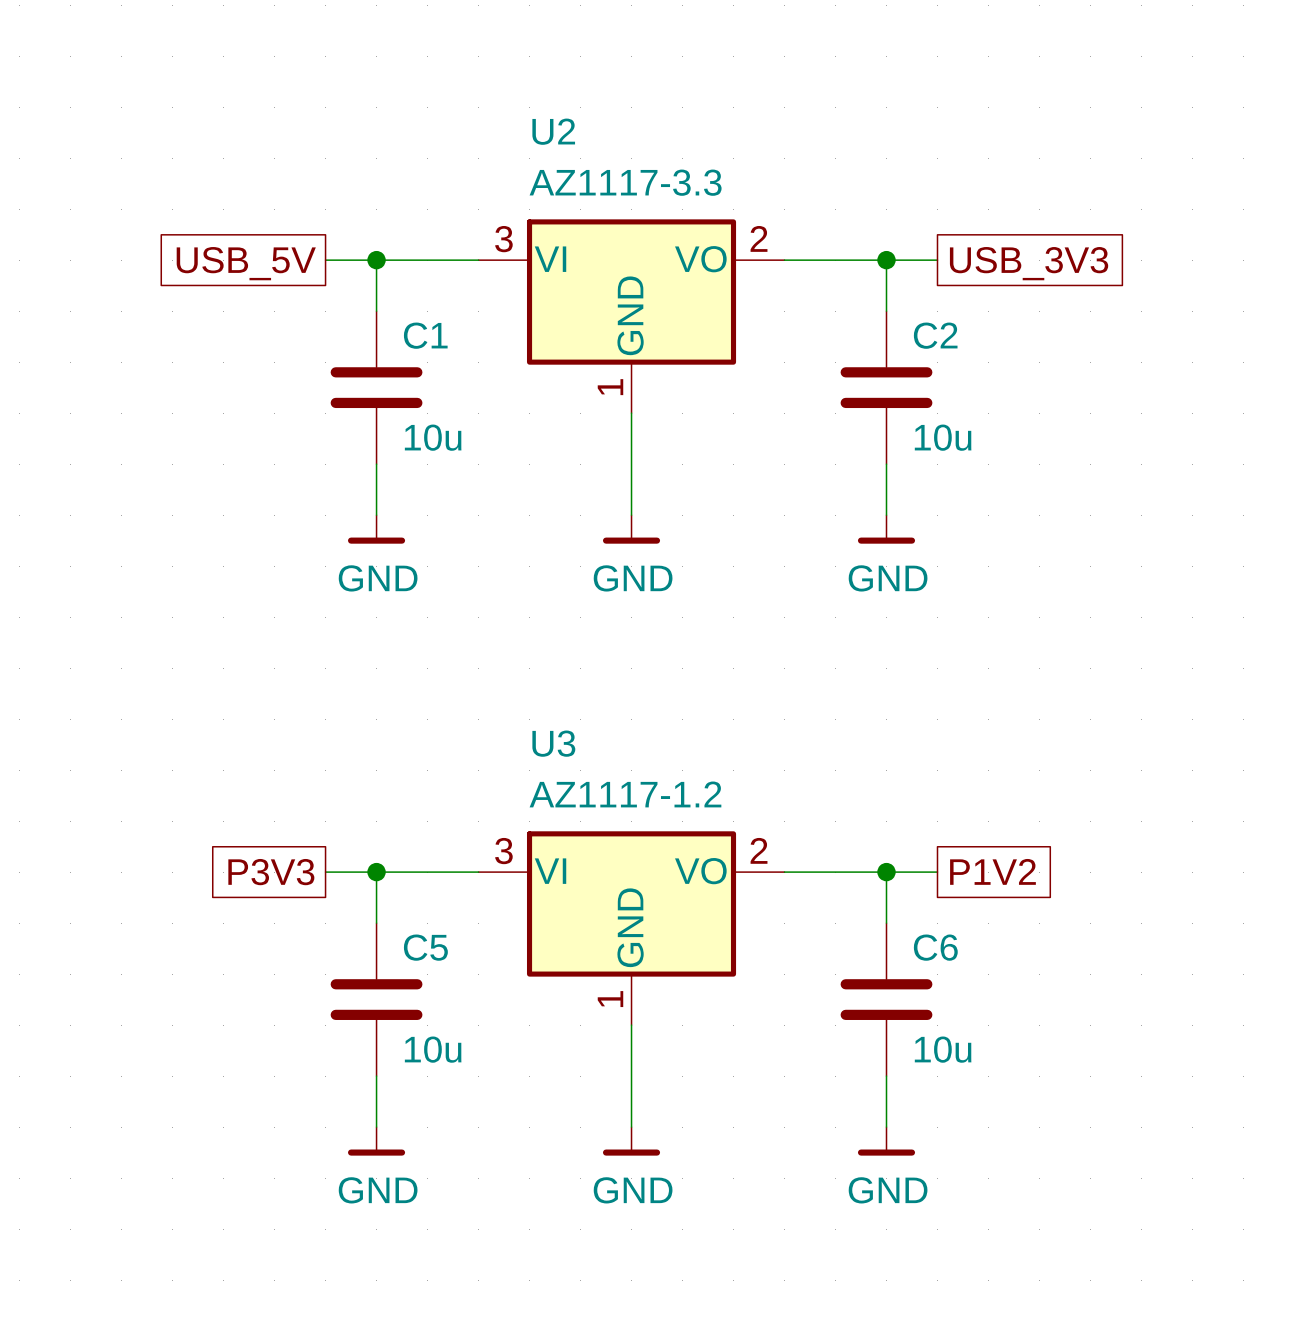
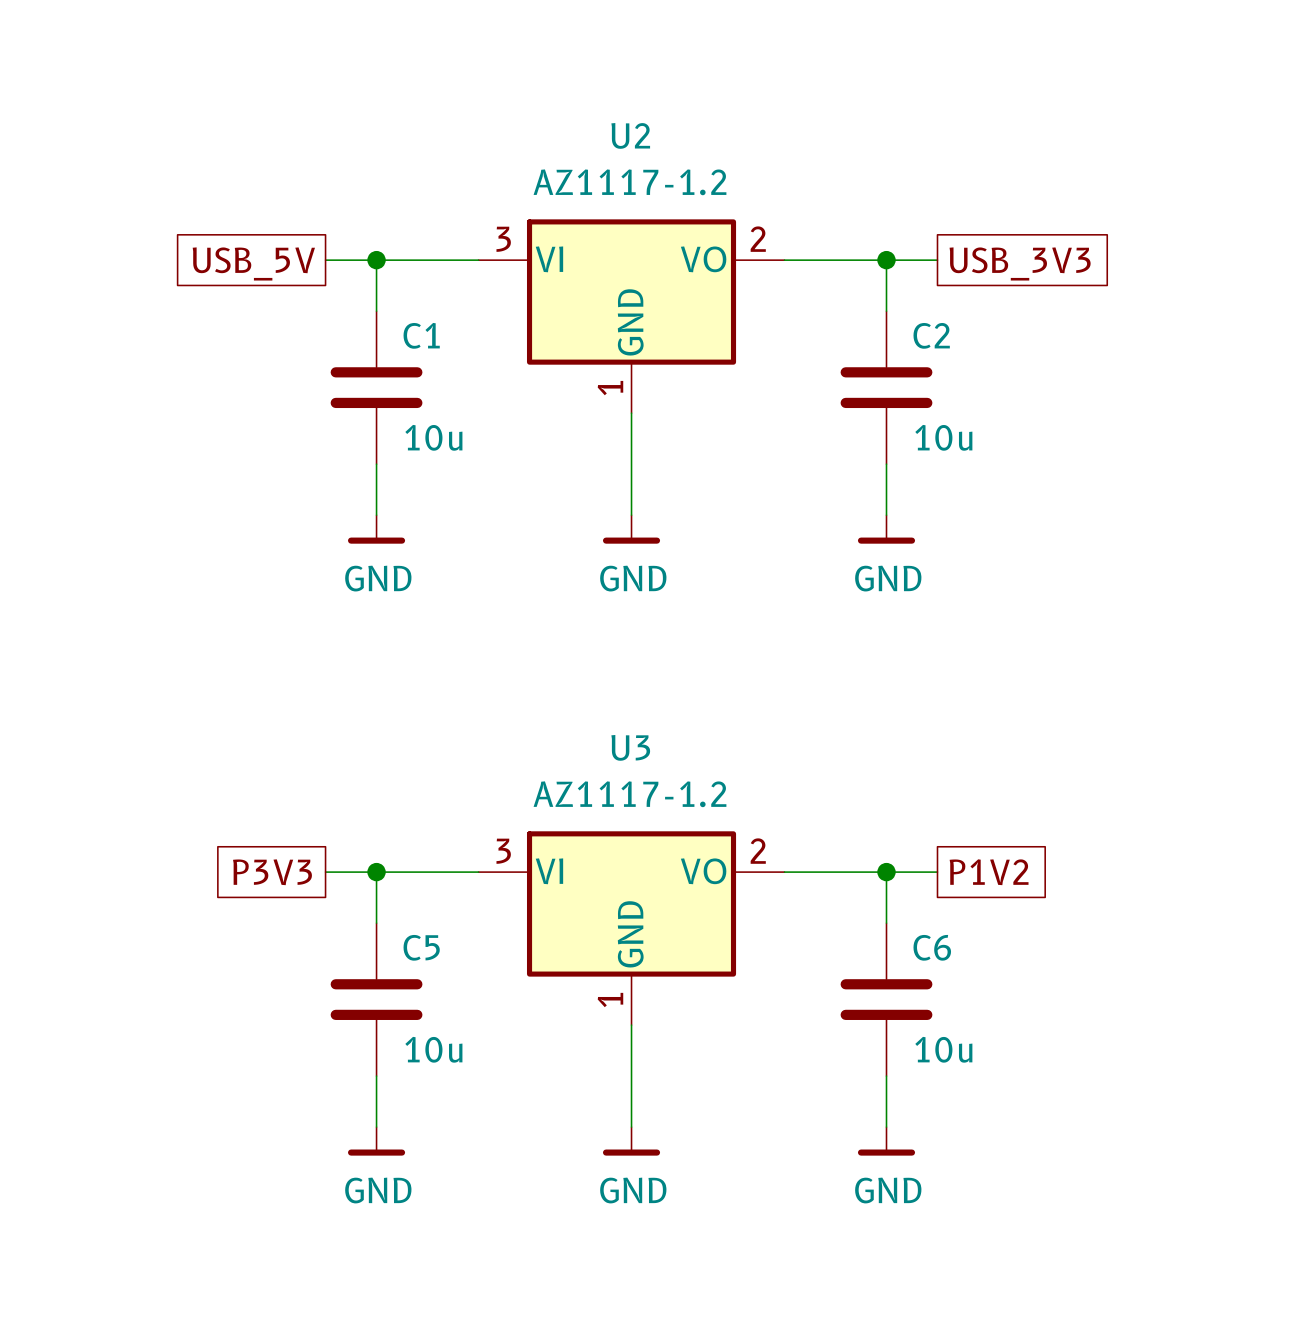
U2 name position: U2 (553, 131) -> U2 (630, 135)
U2 value: AZ1117-3.3 (625, 182) -> AZ1117-1.2 (629, 182)
U3 name position: U3 (553, 743) -> U3 (630, 747)
U3 value position: AZ1117-1.2 (625, 794) -> AZ1117-1.2 (629, 794)

